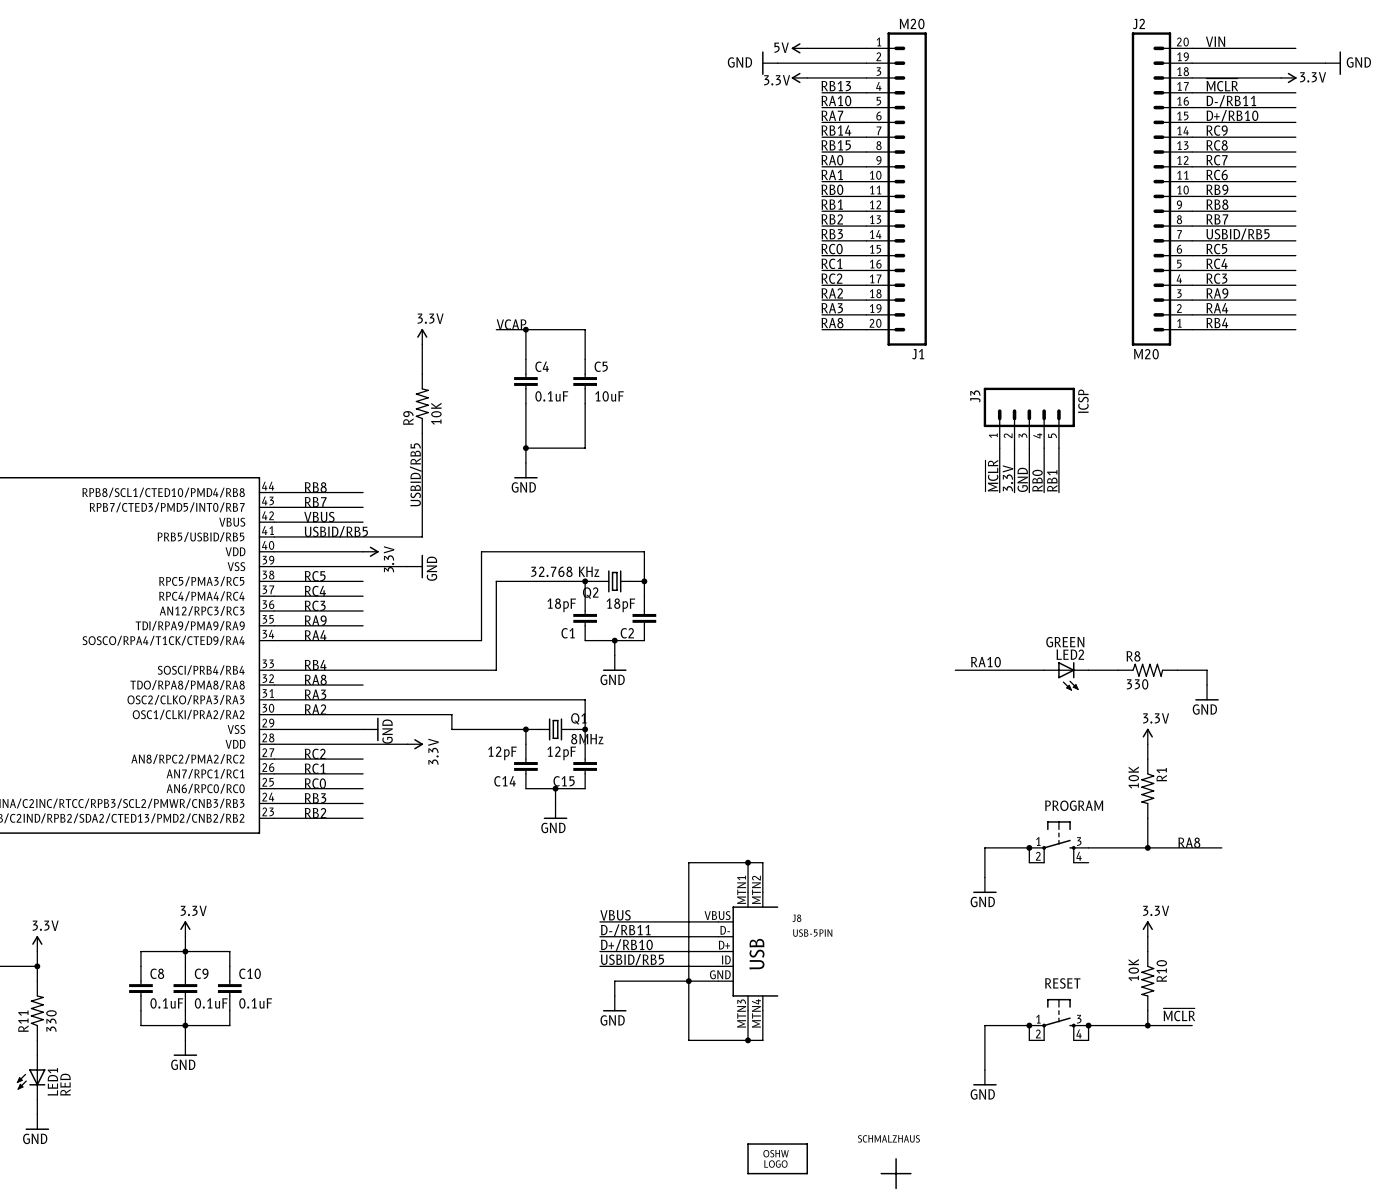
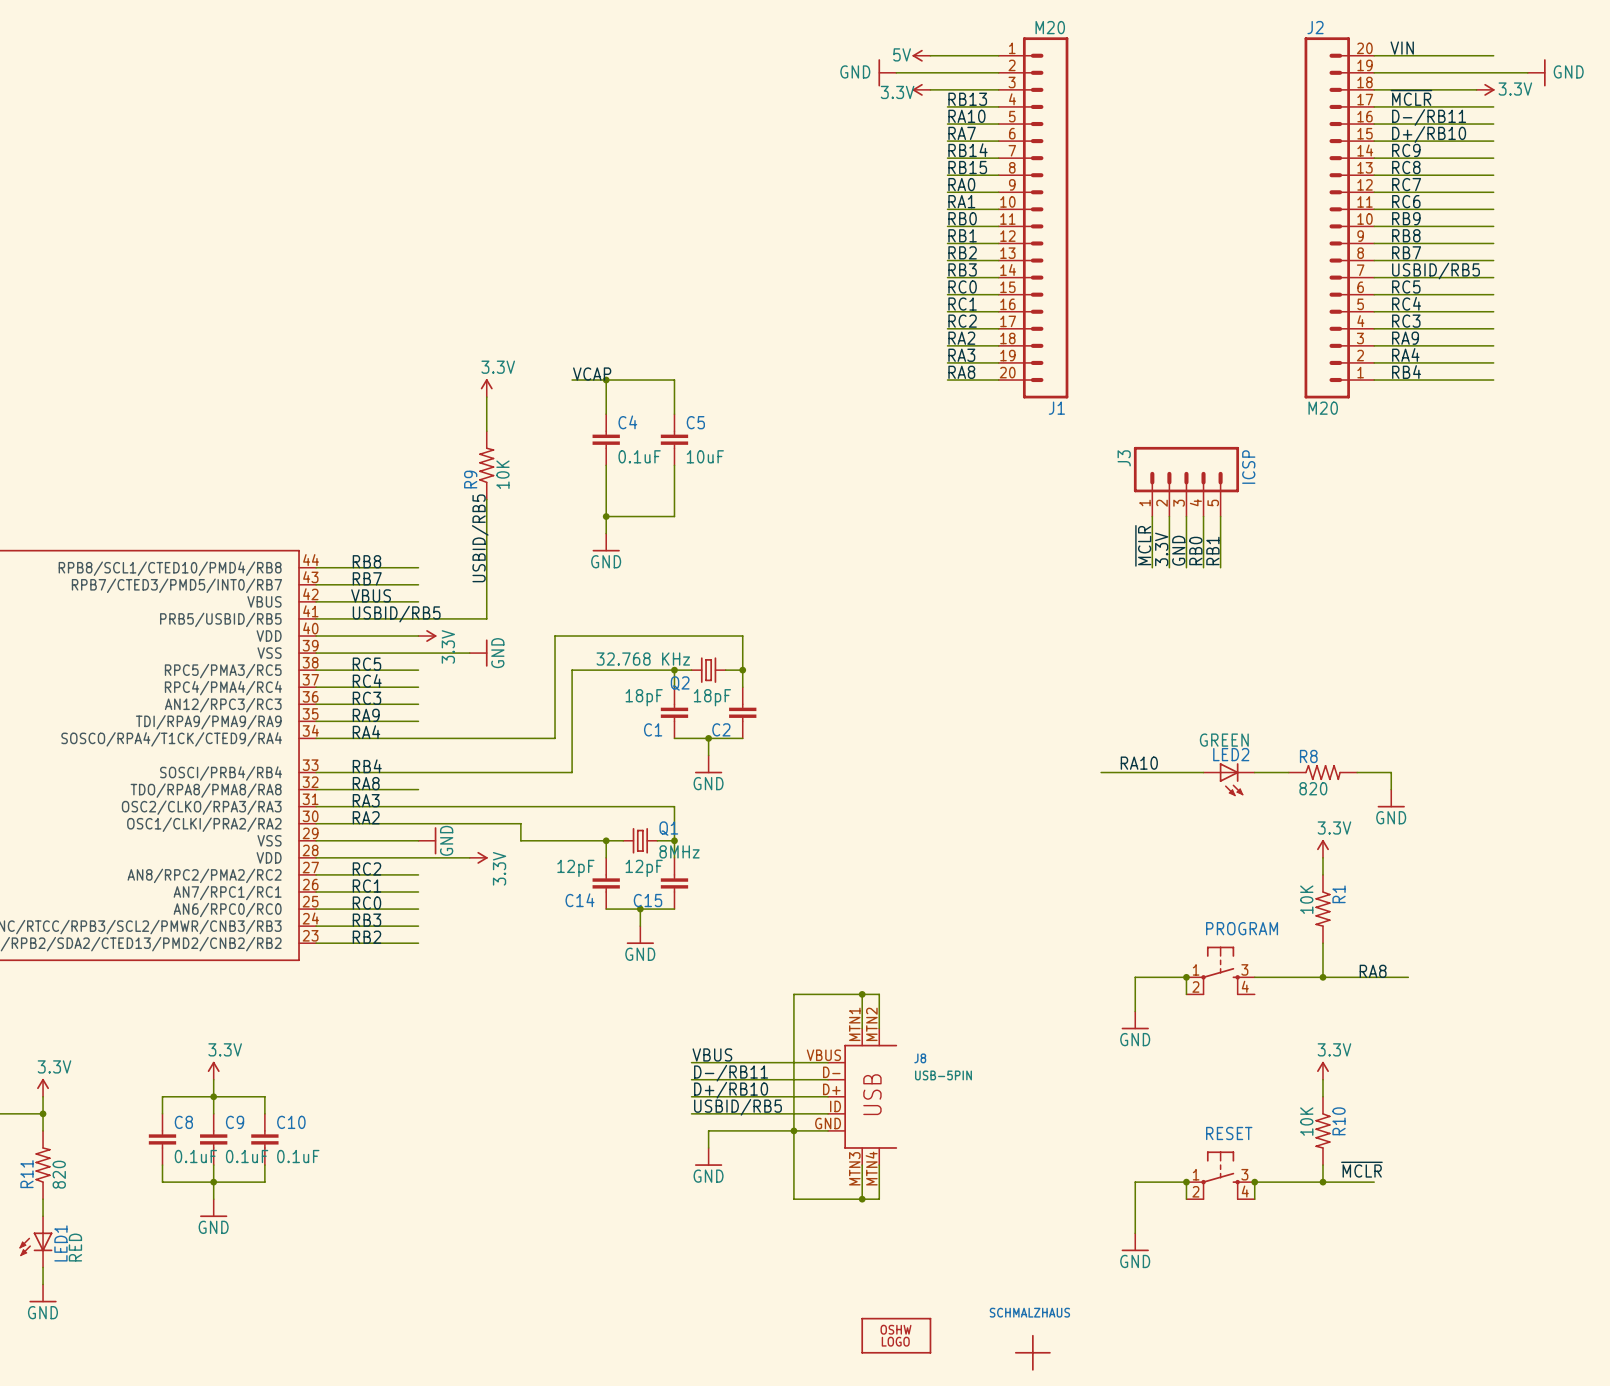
R8 value: 330 (1137, 684) -> 820 (1313, 788)
R11 value: 330 (51, 1020) -> 820 (59, 1174)

